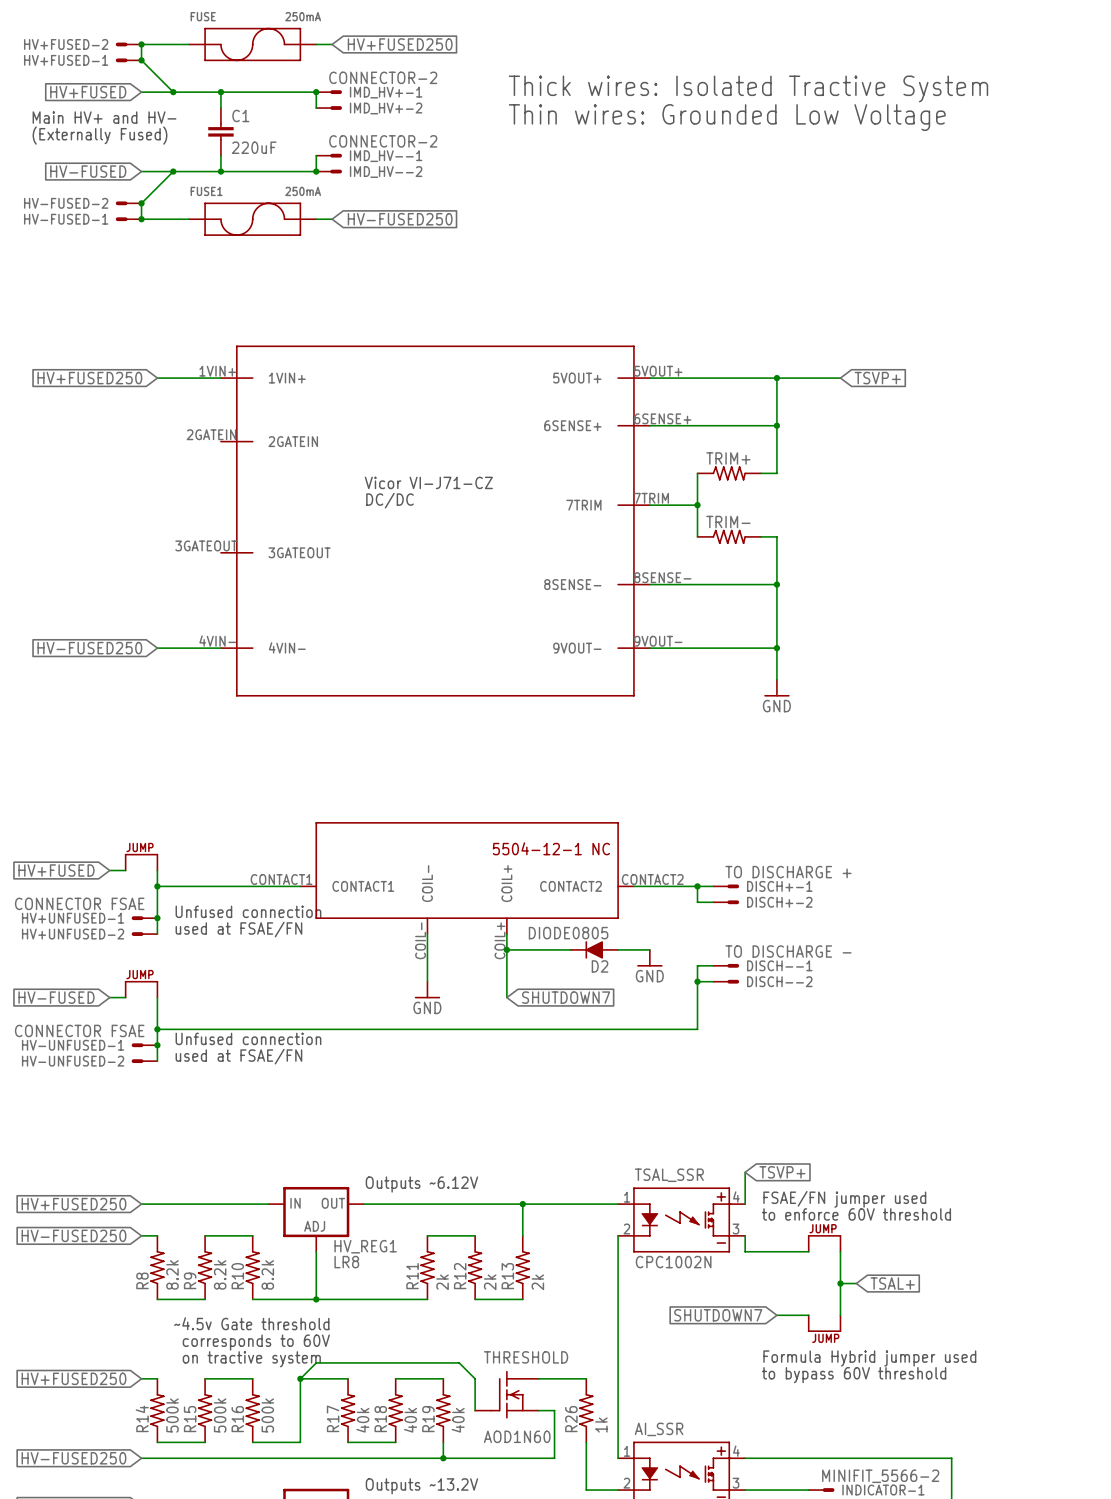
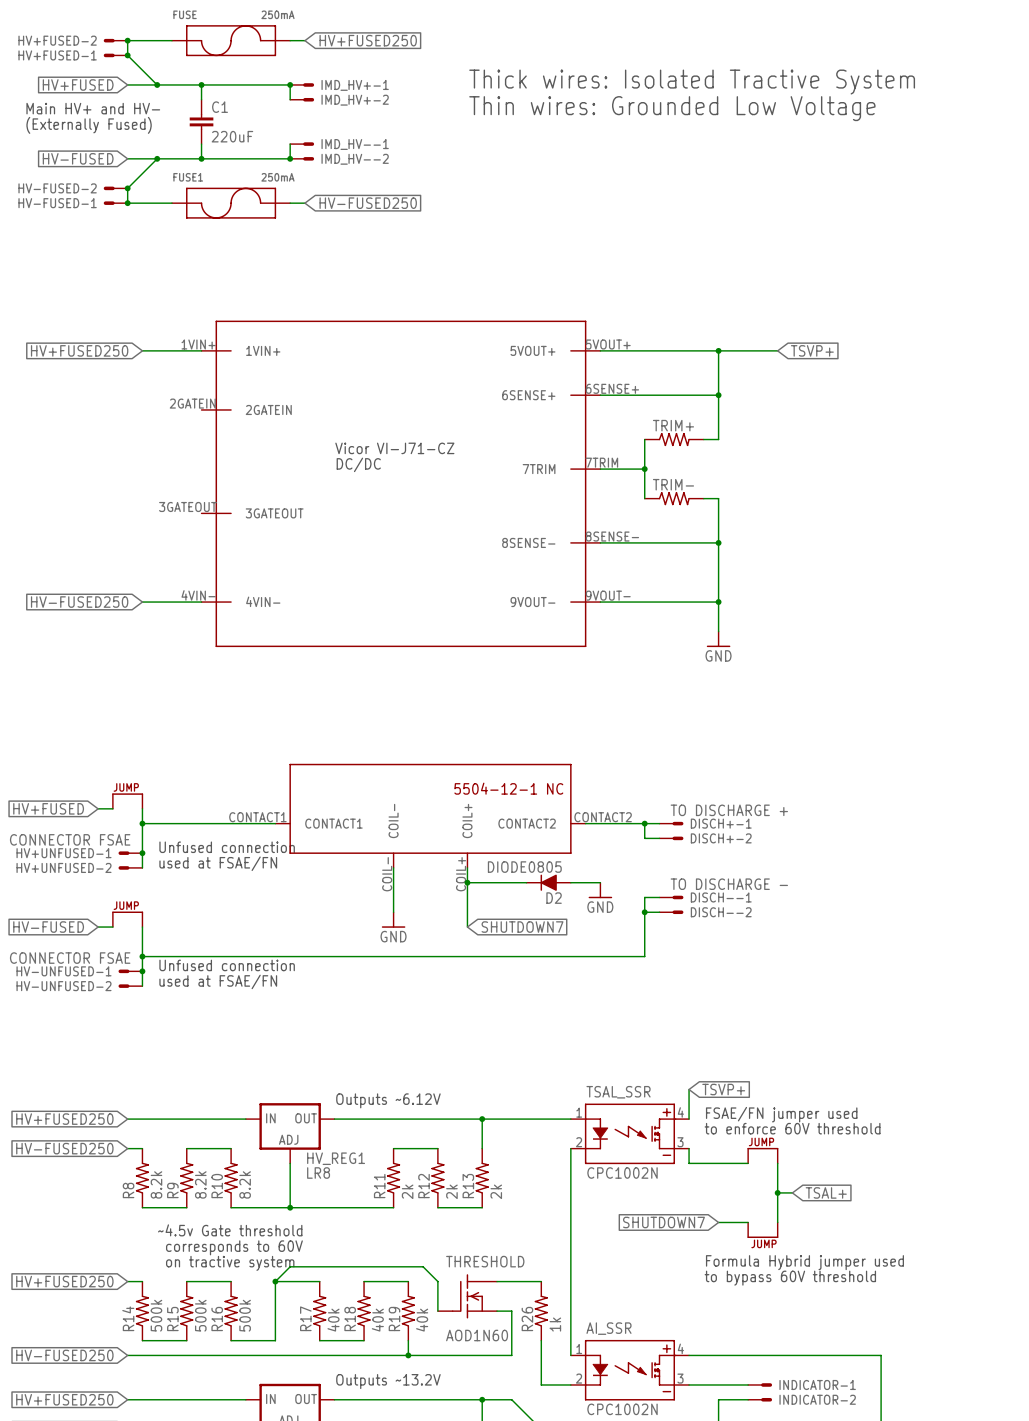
IMD_HV+-1 value: CONNECTOR-2 (383, 77) -> none
IMD_HV--1 value: CONNECTOR-2 (383, 141) -> none
INDICATOR-1 value: MINIFIT_5566-2 (880, 1476) -> none

